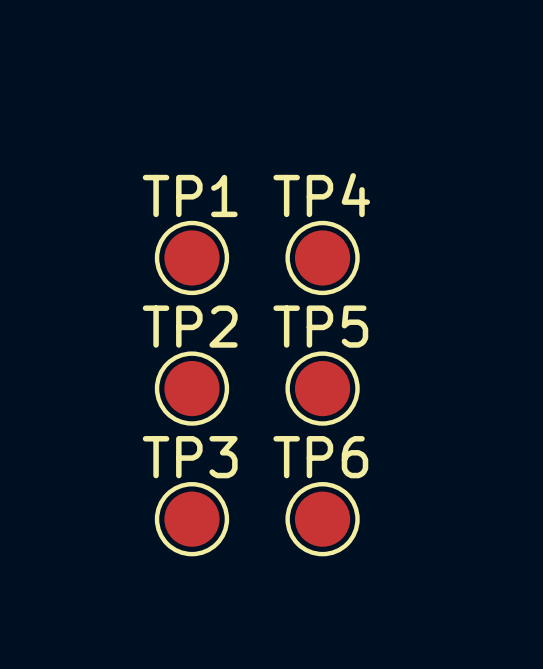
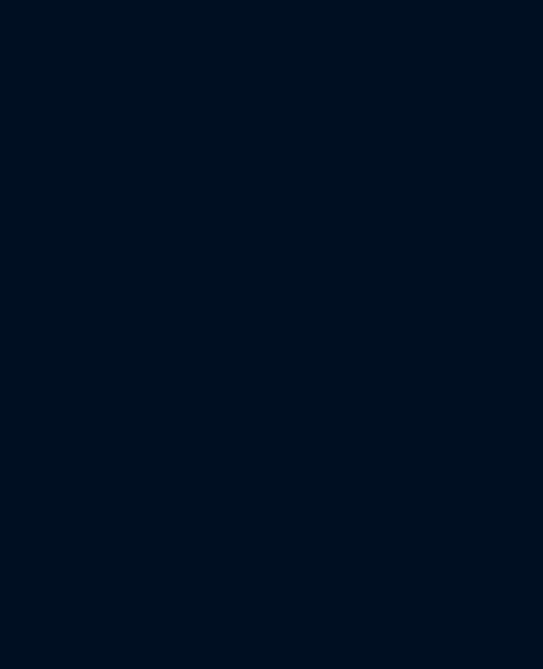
TP1: (191, 257) -> none
TP4: (322, 257) -> none
TP2: (191, 388) -> none
TP5: (322, 388) -> none
TP3: (191, 519) -> none
TP6: (322, 519) -> none

